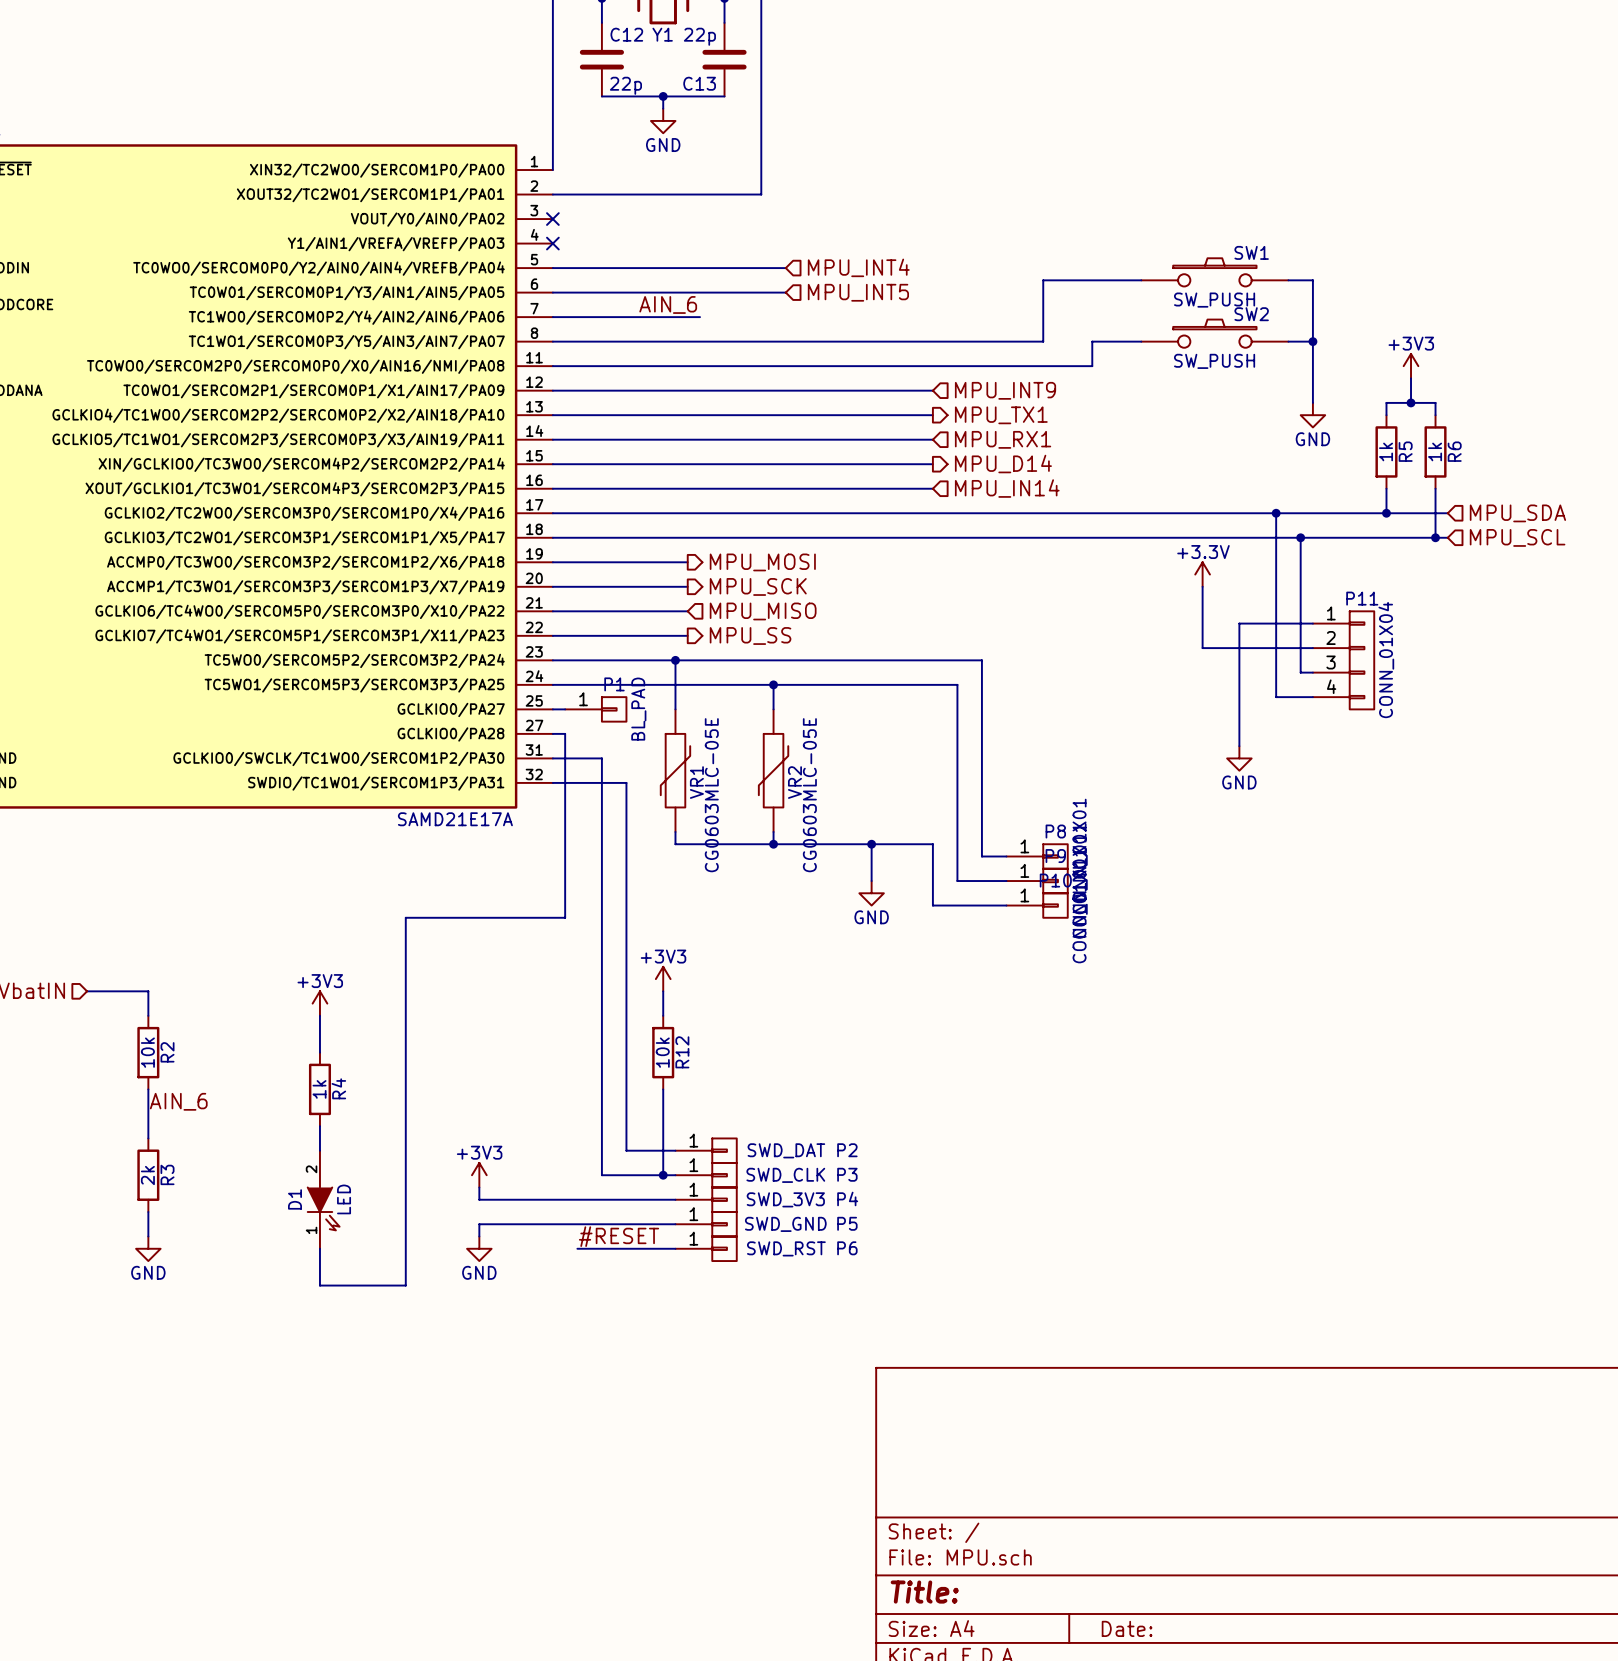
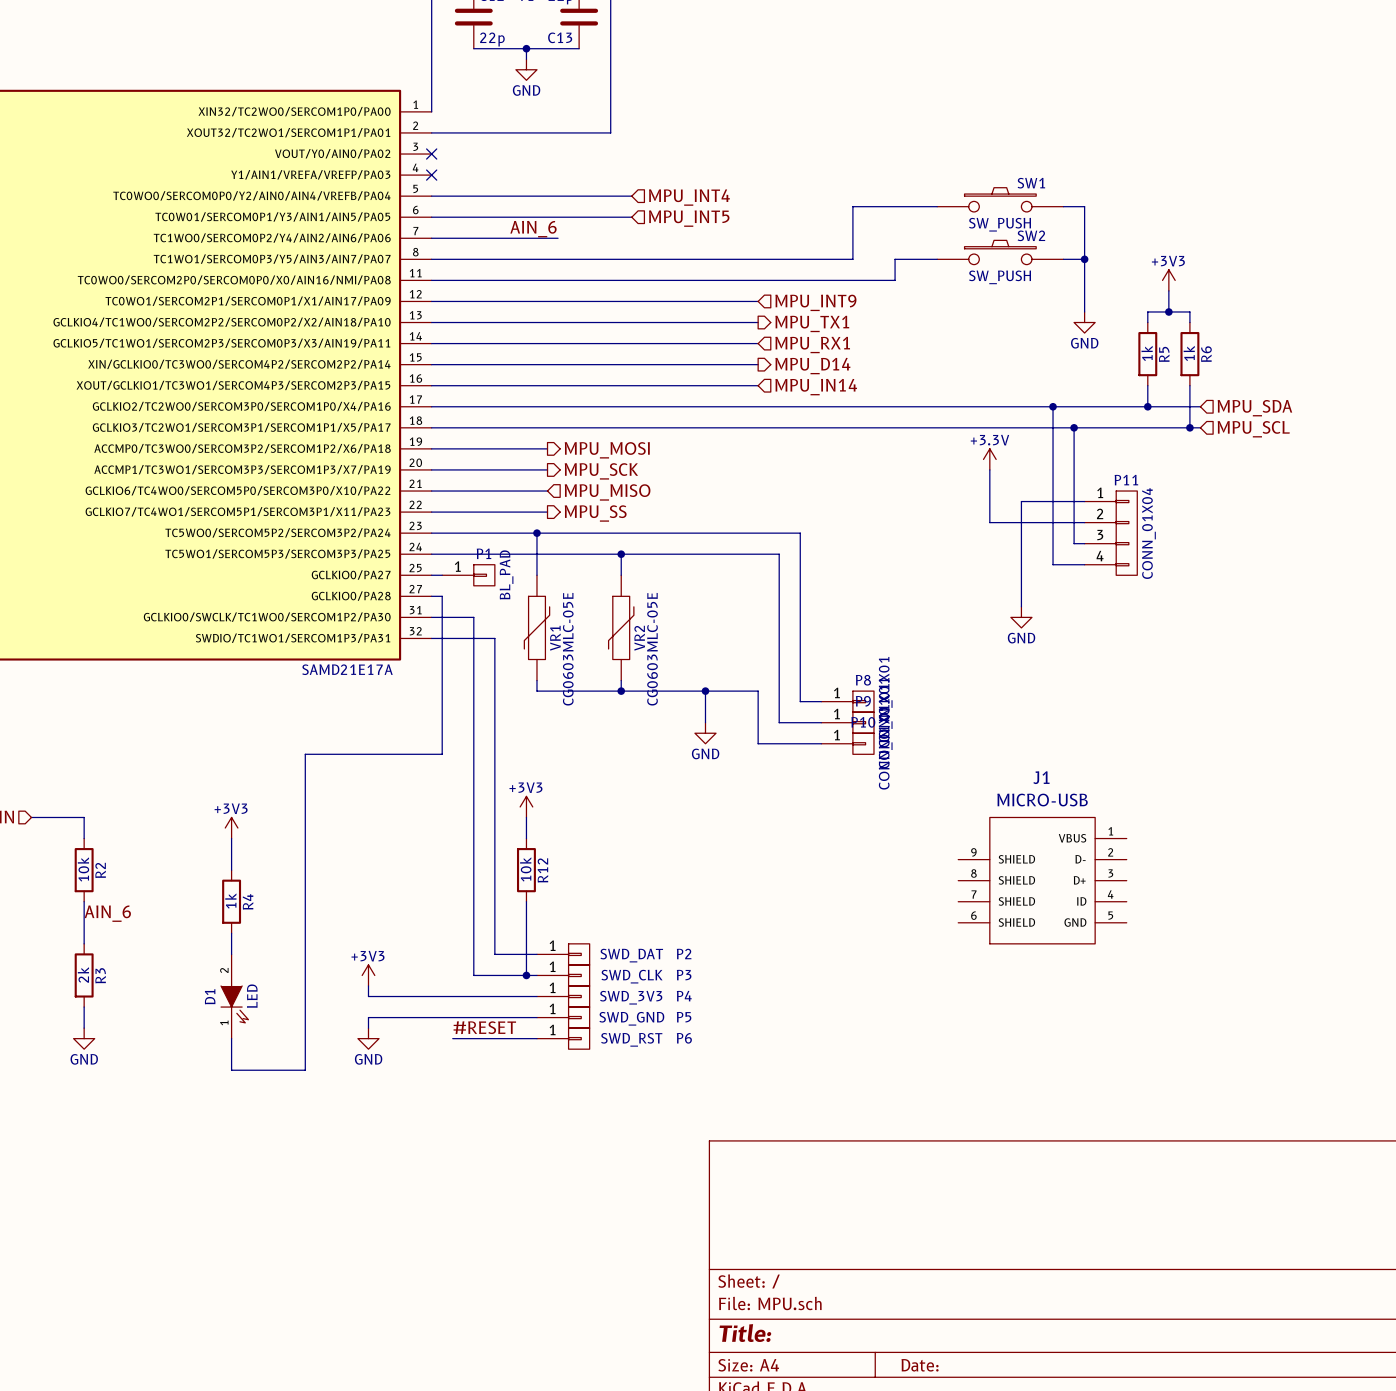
J1: none -> MICRO-USB (1042, 880)

